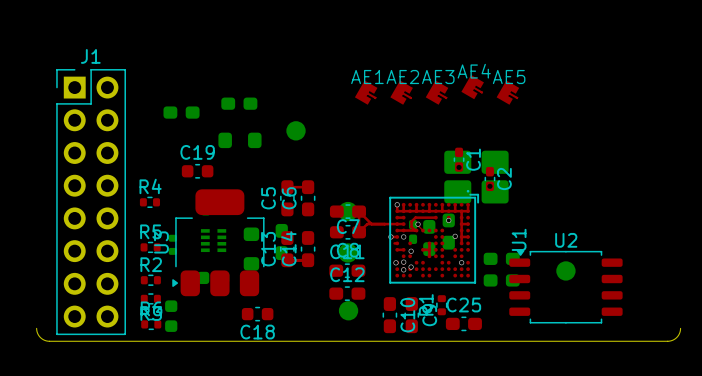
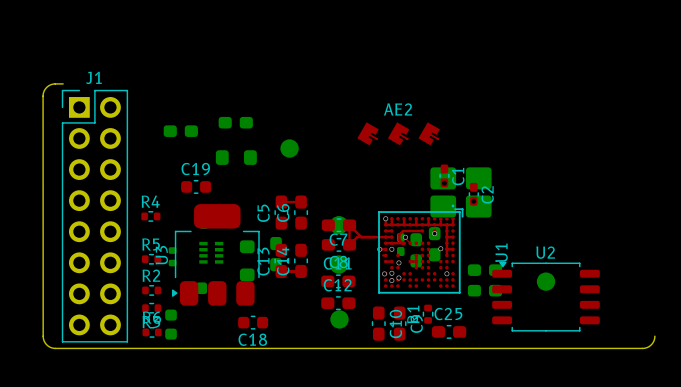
board edge: none -> (63, 83) (49, 85) (45, 88) (43, 94) (43, 336)
AE2 footprint: [390, 80, 413, 105] -> [357, 122, 440, 146]
AE4: (472, 87) -> none
AE1: (366, 92) -> none
AE3: (437, 92) -> none
AE5: (507, 92) -> none

